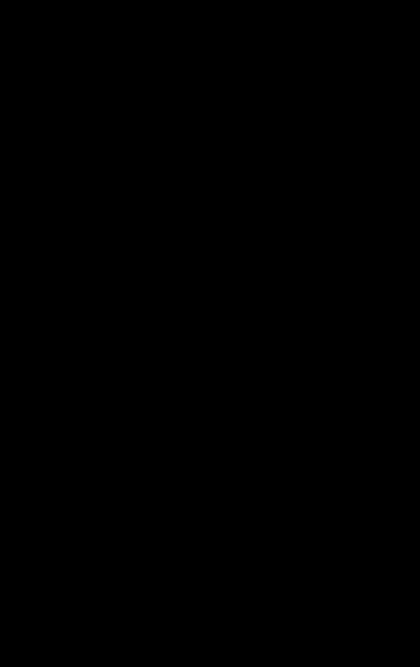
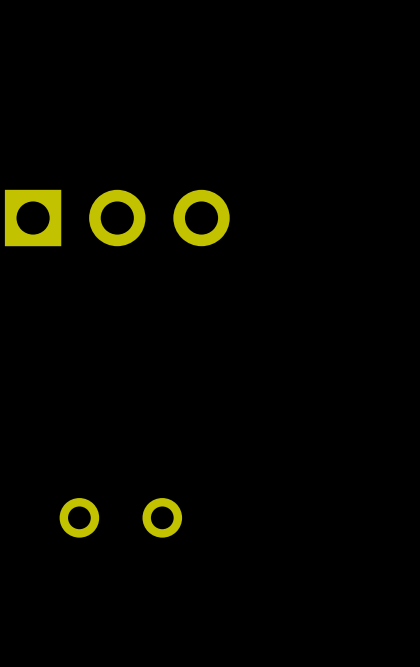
part: none -> (117, 218)
part: none -> (120, 493)

